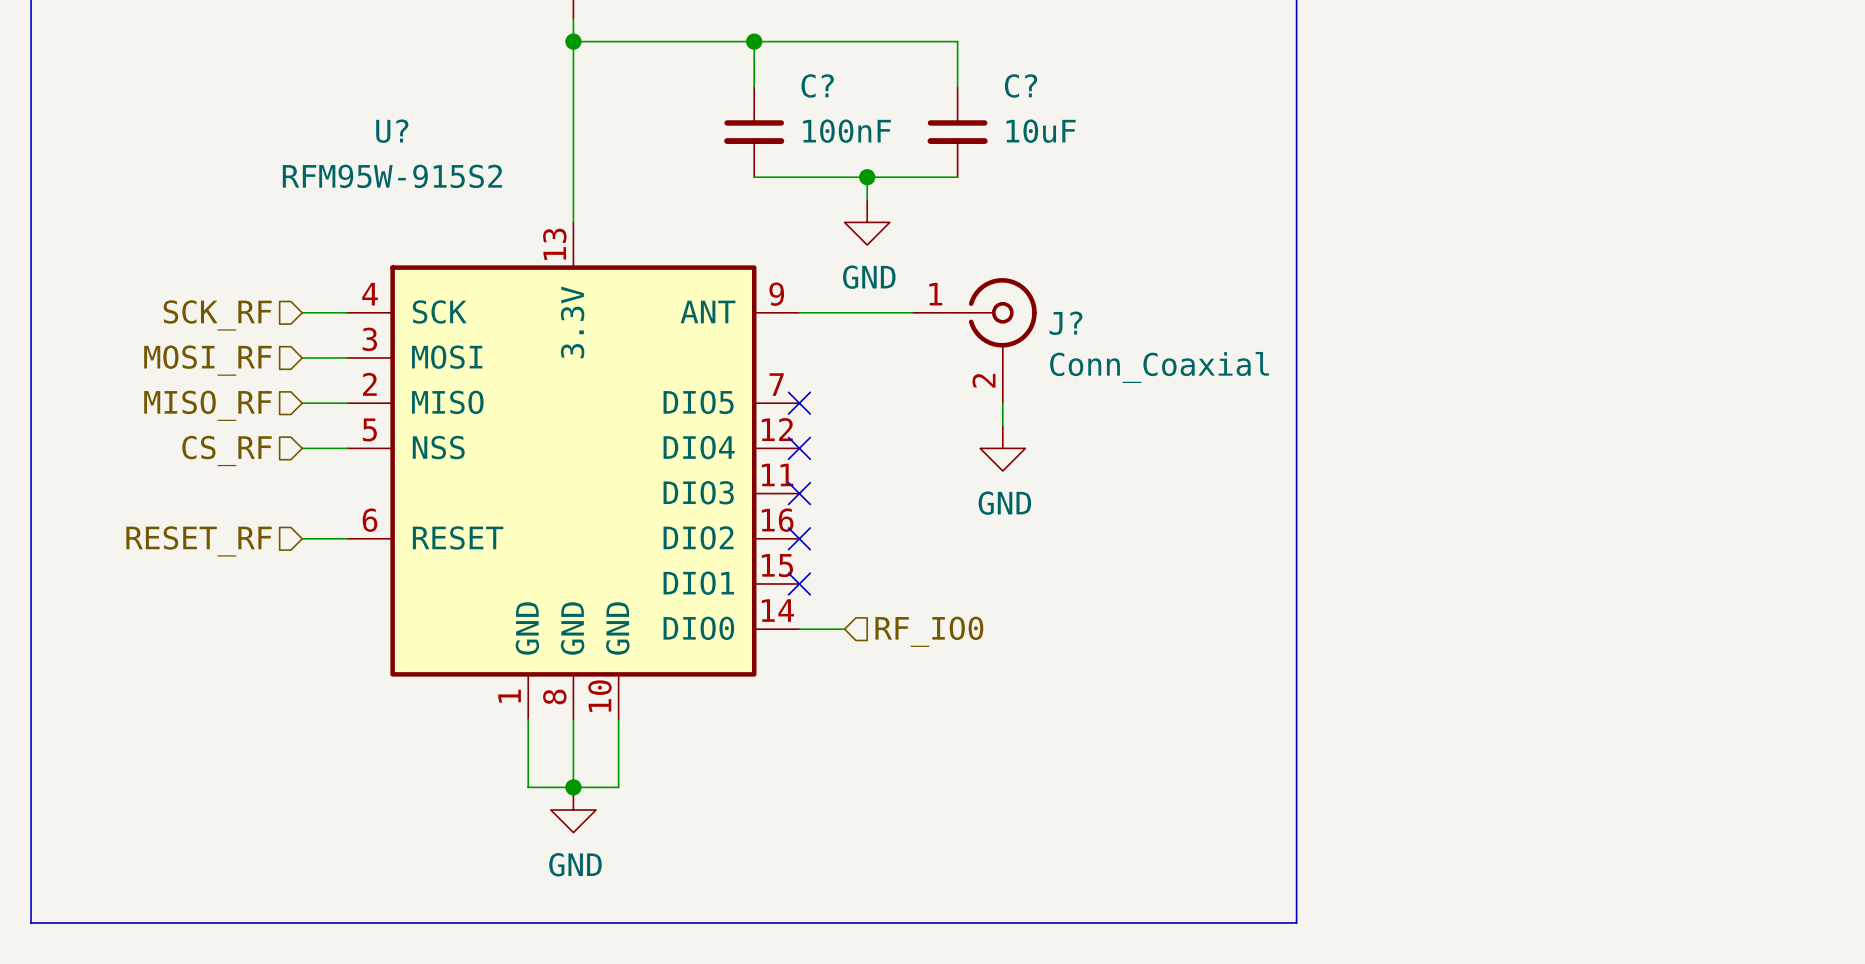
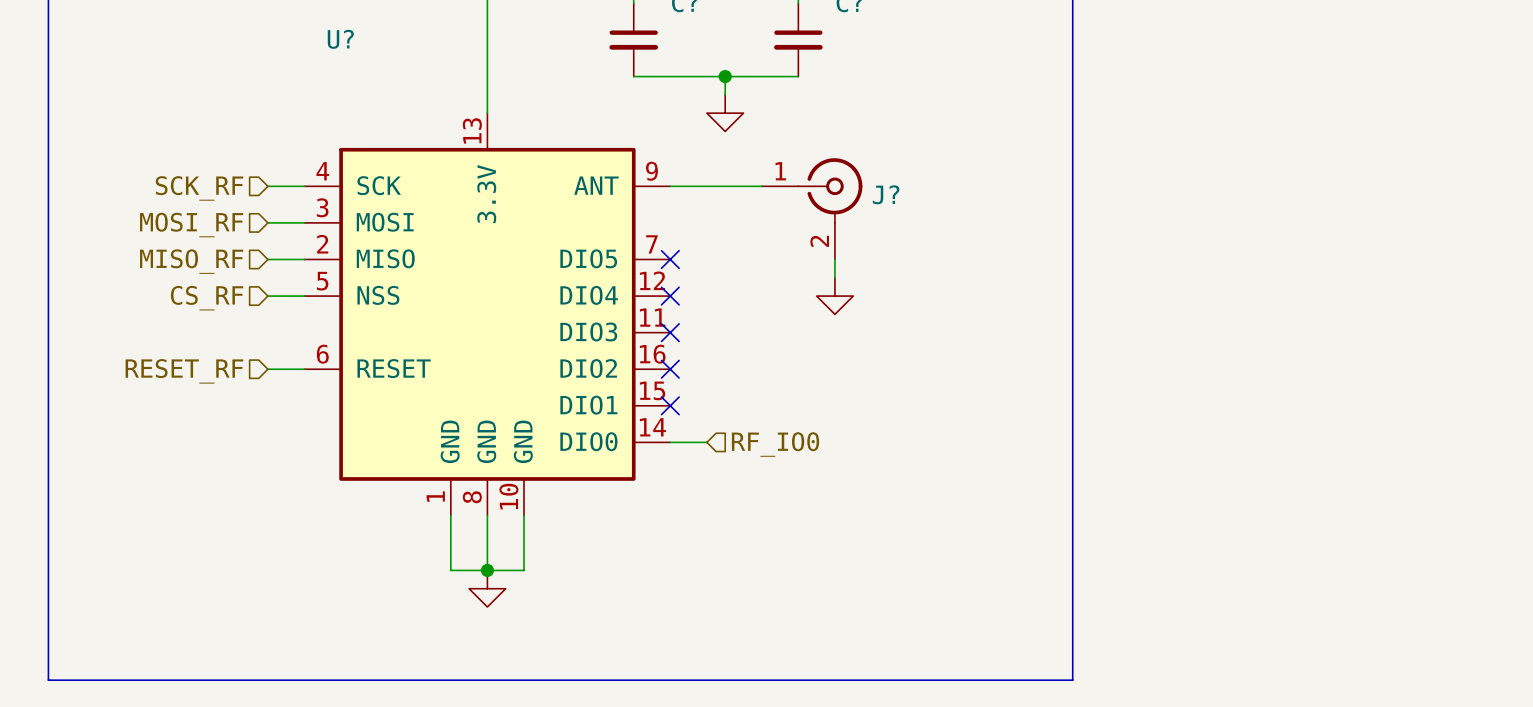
C? value: 100nF (847, 131) -> none
C? value: 10uF (1041, 131) -> none
U? value: RFM95W-915S2 (392, 176) -> none
power symbol text: GND (869, 277) -> none
J? value: Conn_Coaxial (1159, 367) -> none
power symbol text: GND (1004, 503) -> none
power symbol text: GND (575, 864) -> none

